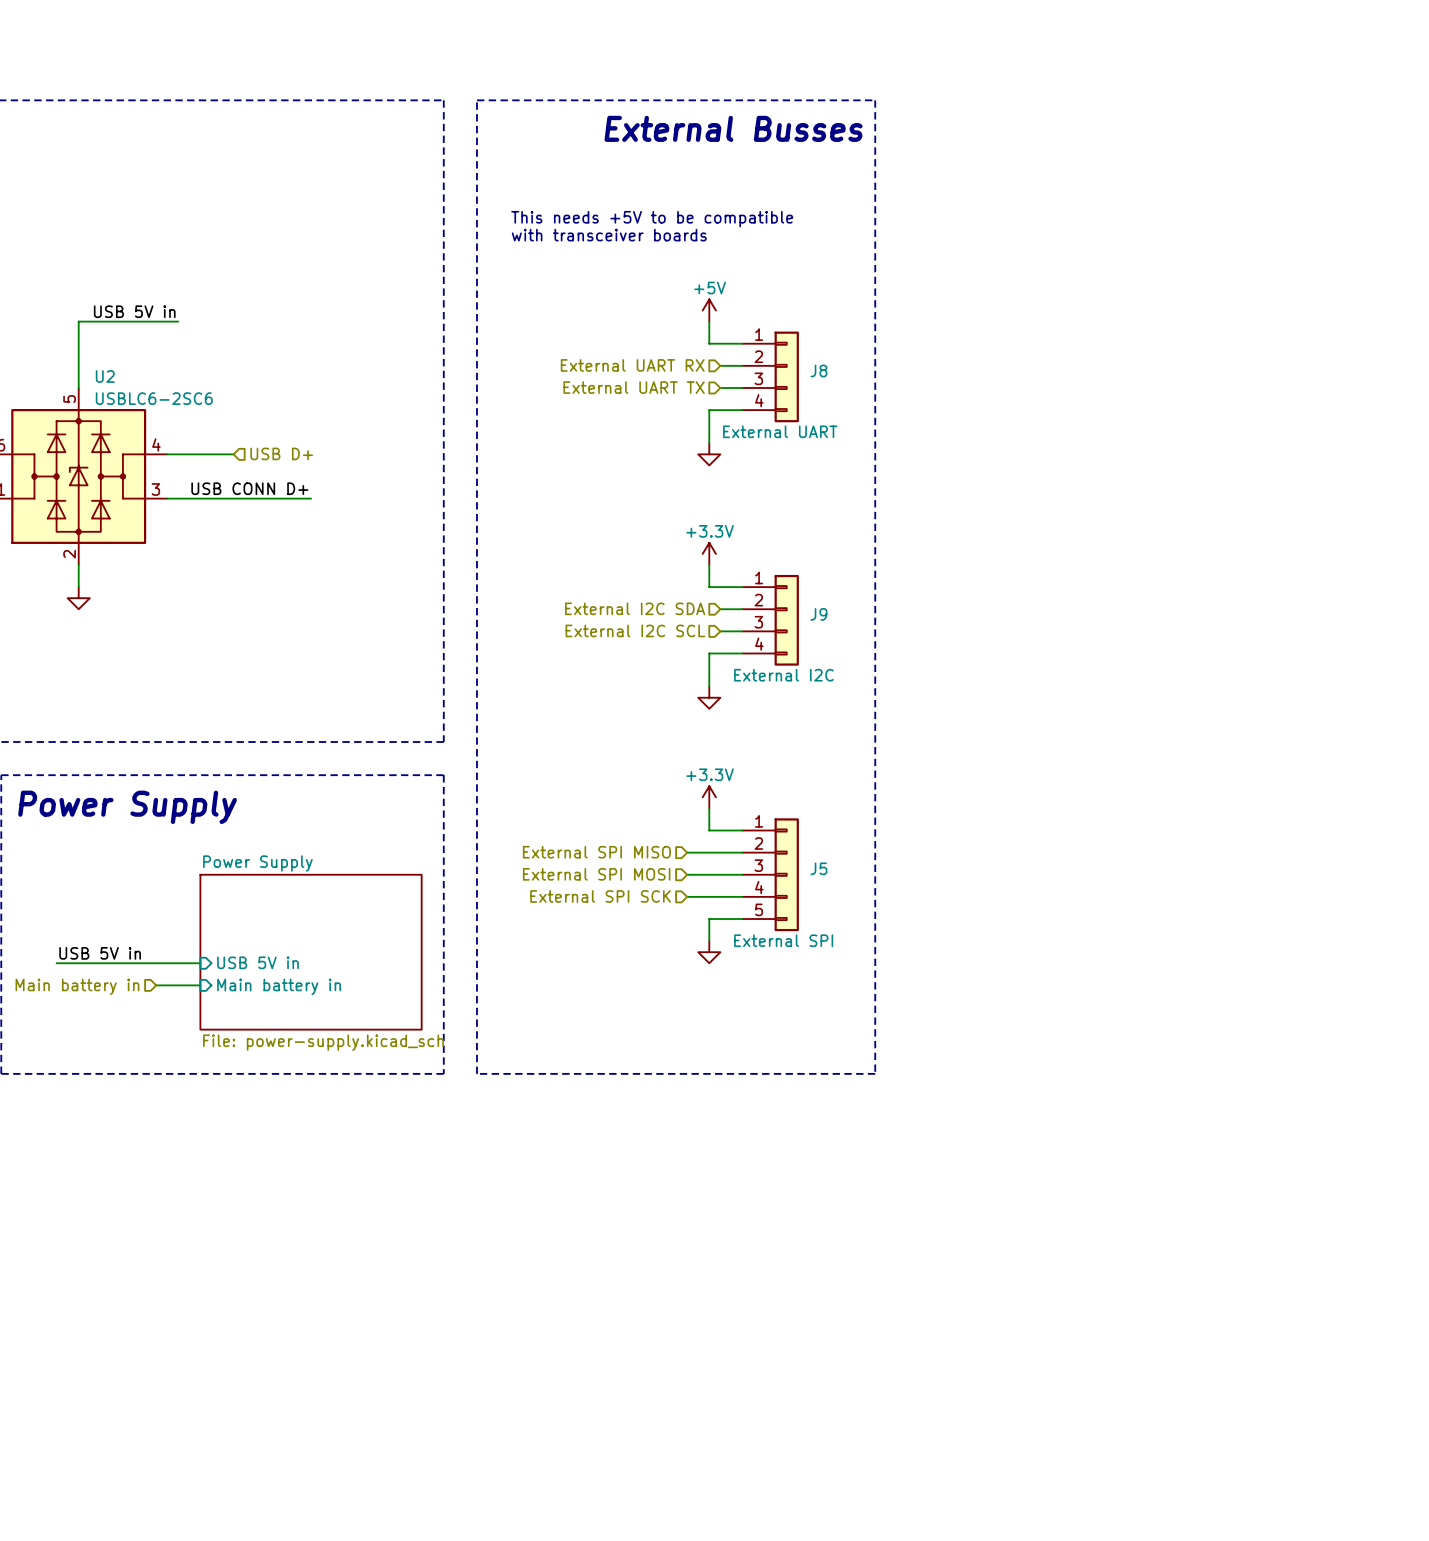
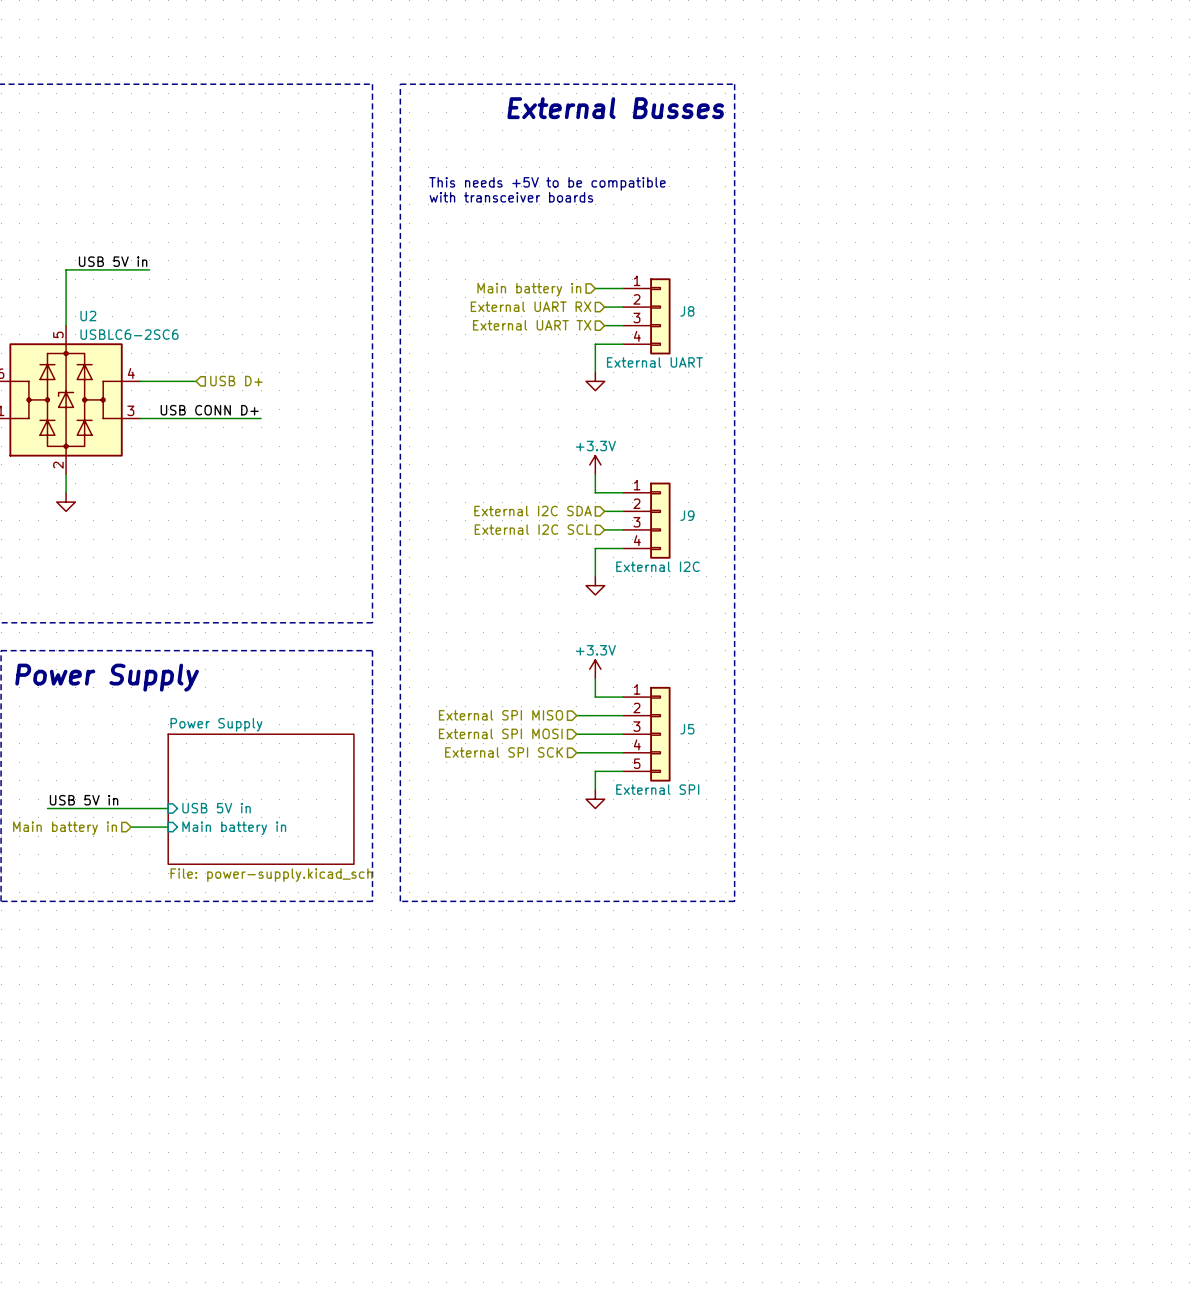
power symbol: +5V (709, 310) -> none
wire: (709, 321) (709, 343) -> none
hierarchical label: none -> Main battery in (529, 289)

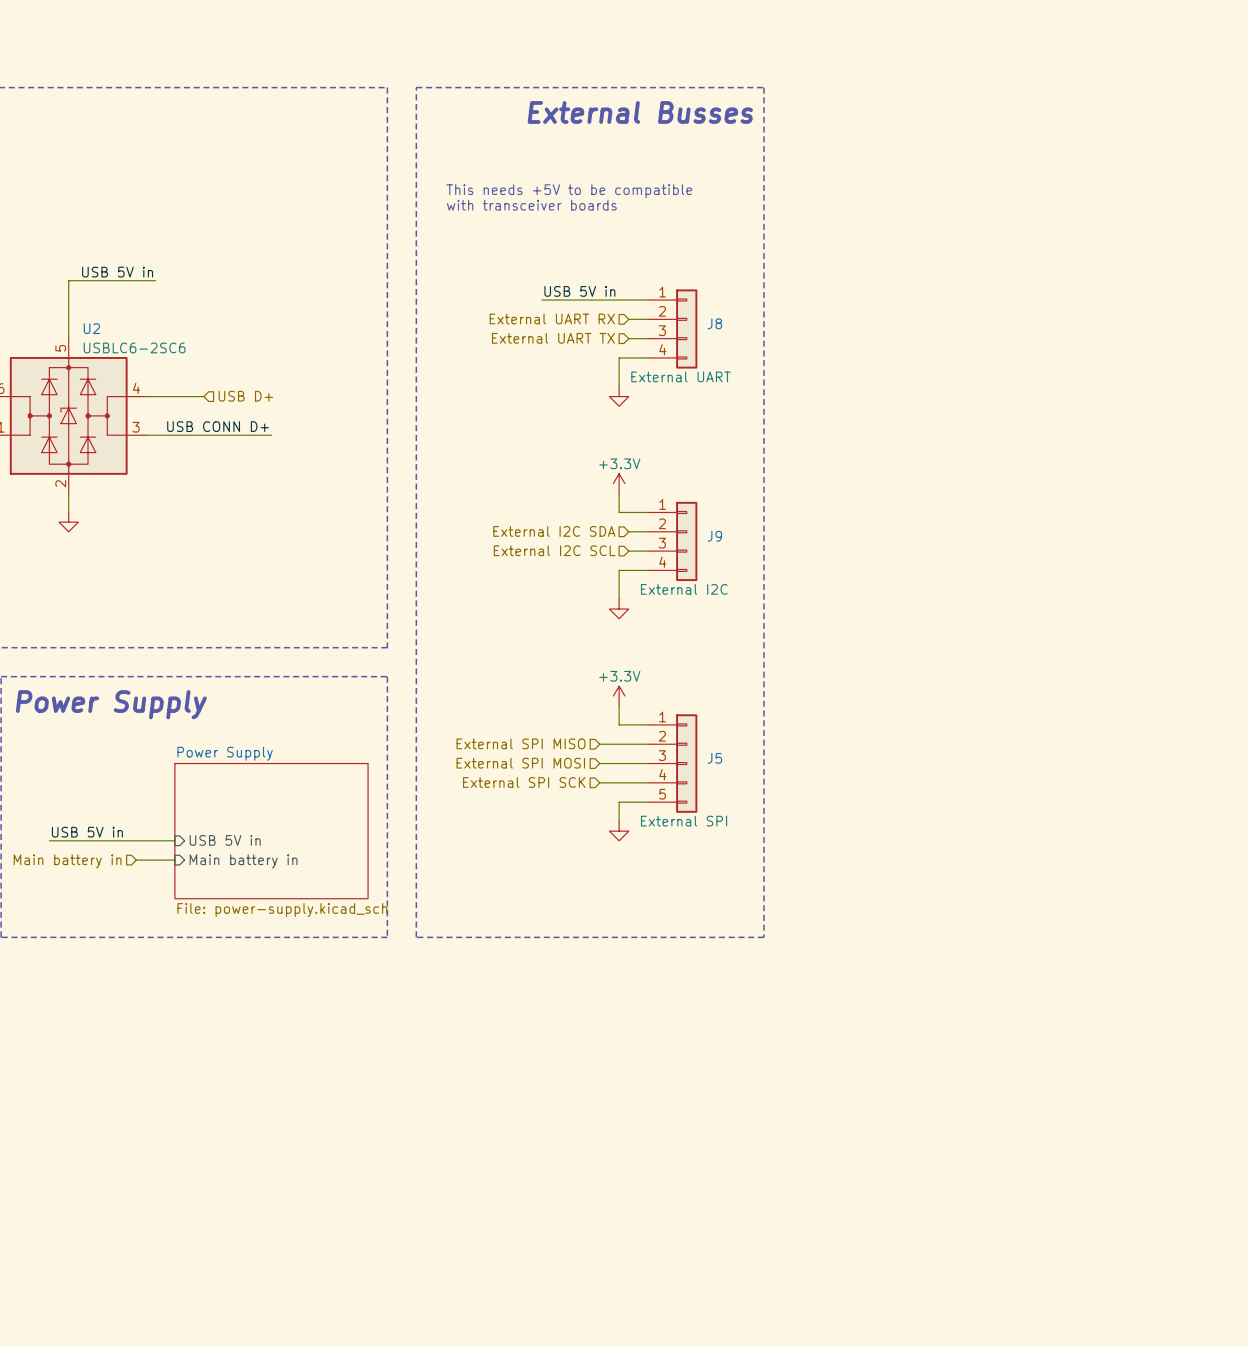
label: none -> USB 5V in (579, 291)
wire: none -> (541, 300) (619, 300)
hierarchical label: Main battery in (529, 289) -> none

